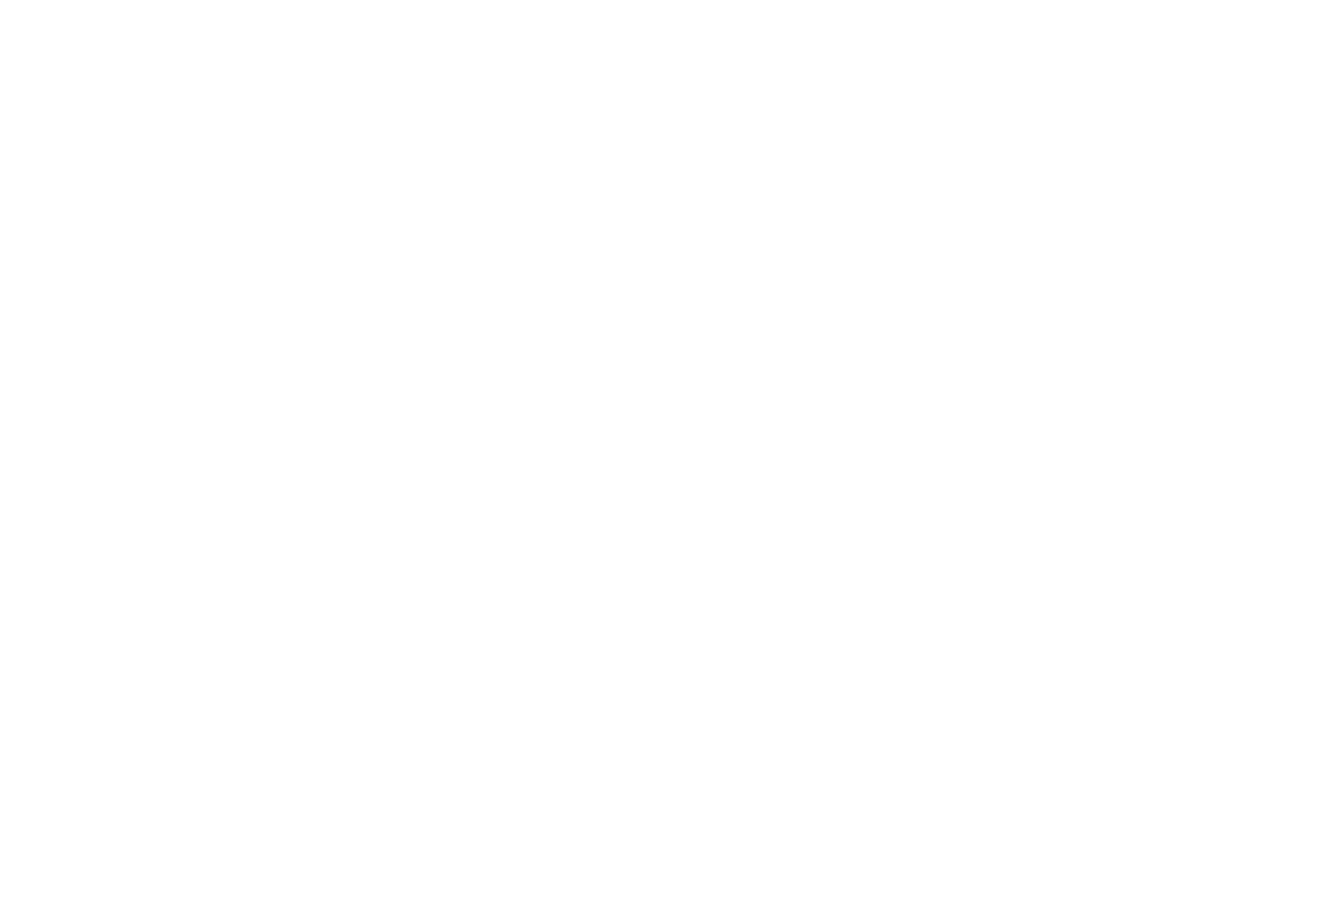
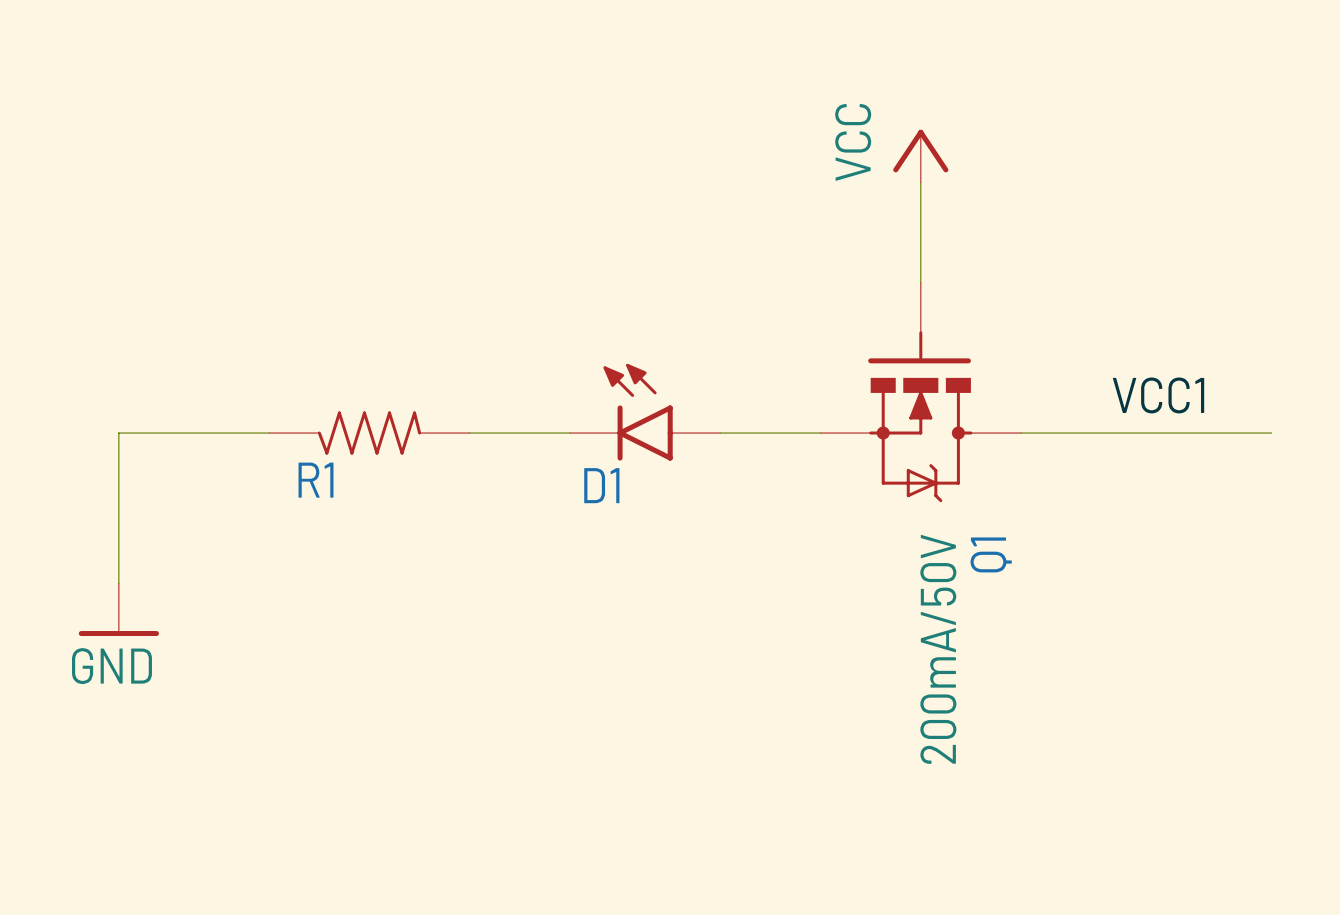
power symbol: none -> VCC (920, 156)
wire: none -> (920, 182) (920, 282)
Q1: none -> 200mA/50V (920, 392)
label: none -> VCC1 (1158, 395)
D1: none -> (645, 412)
wire: none -> (269, 433) (118, 433) (118, 583)
R1: none -> (369, 433)
wire: none -> (469, 433) (569, 433)
wire: none -> (720, 433) (820, 433)
wire: none -> (1021, 433) (1271, 433)
power symbol: none -> GND (118, 609)

